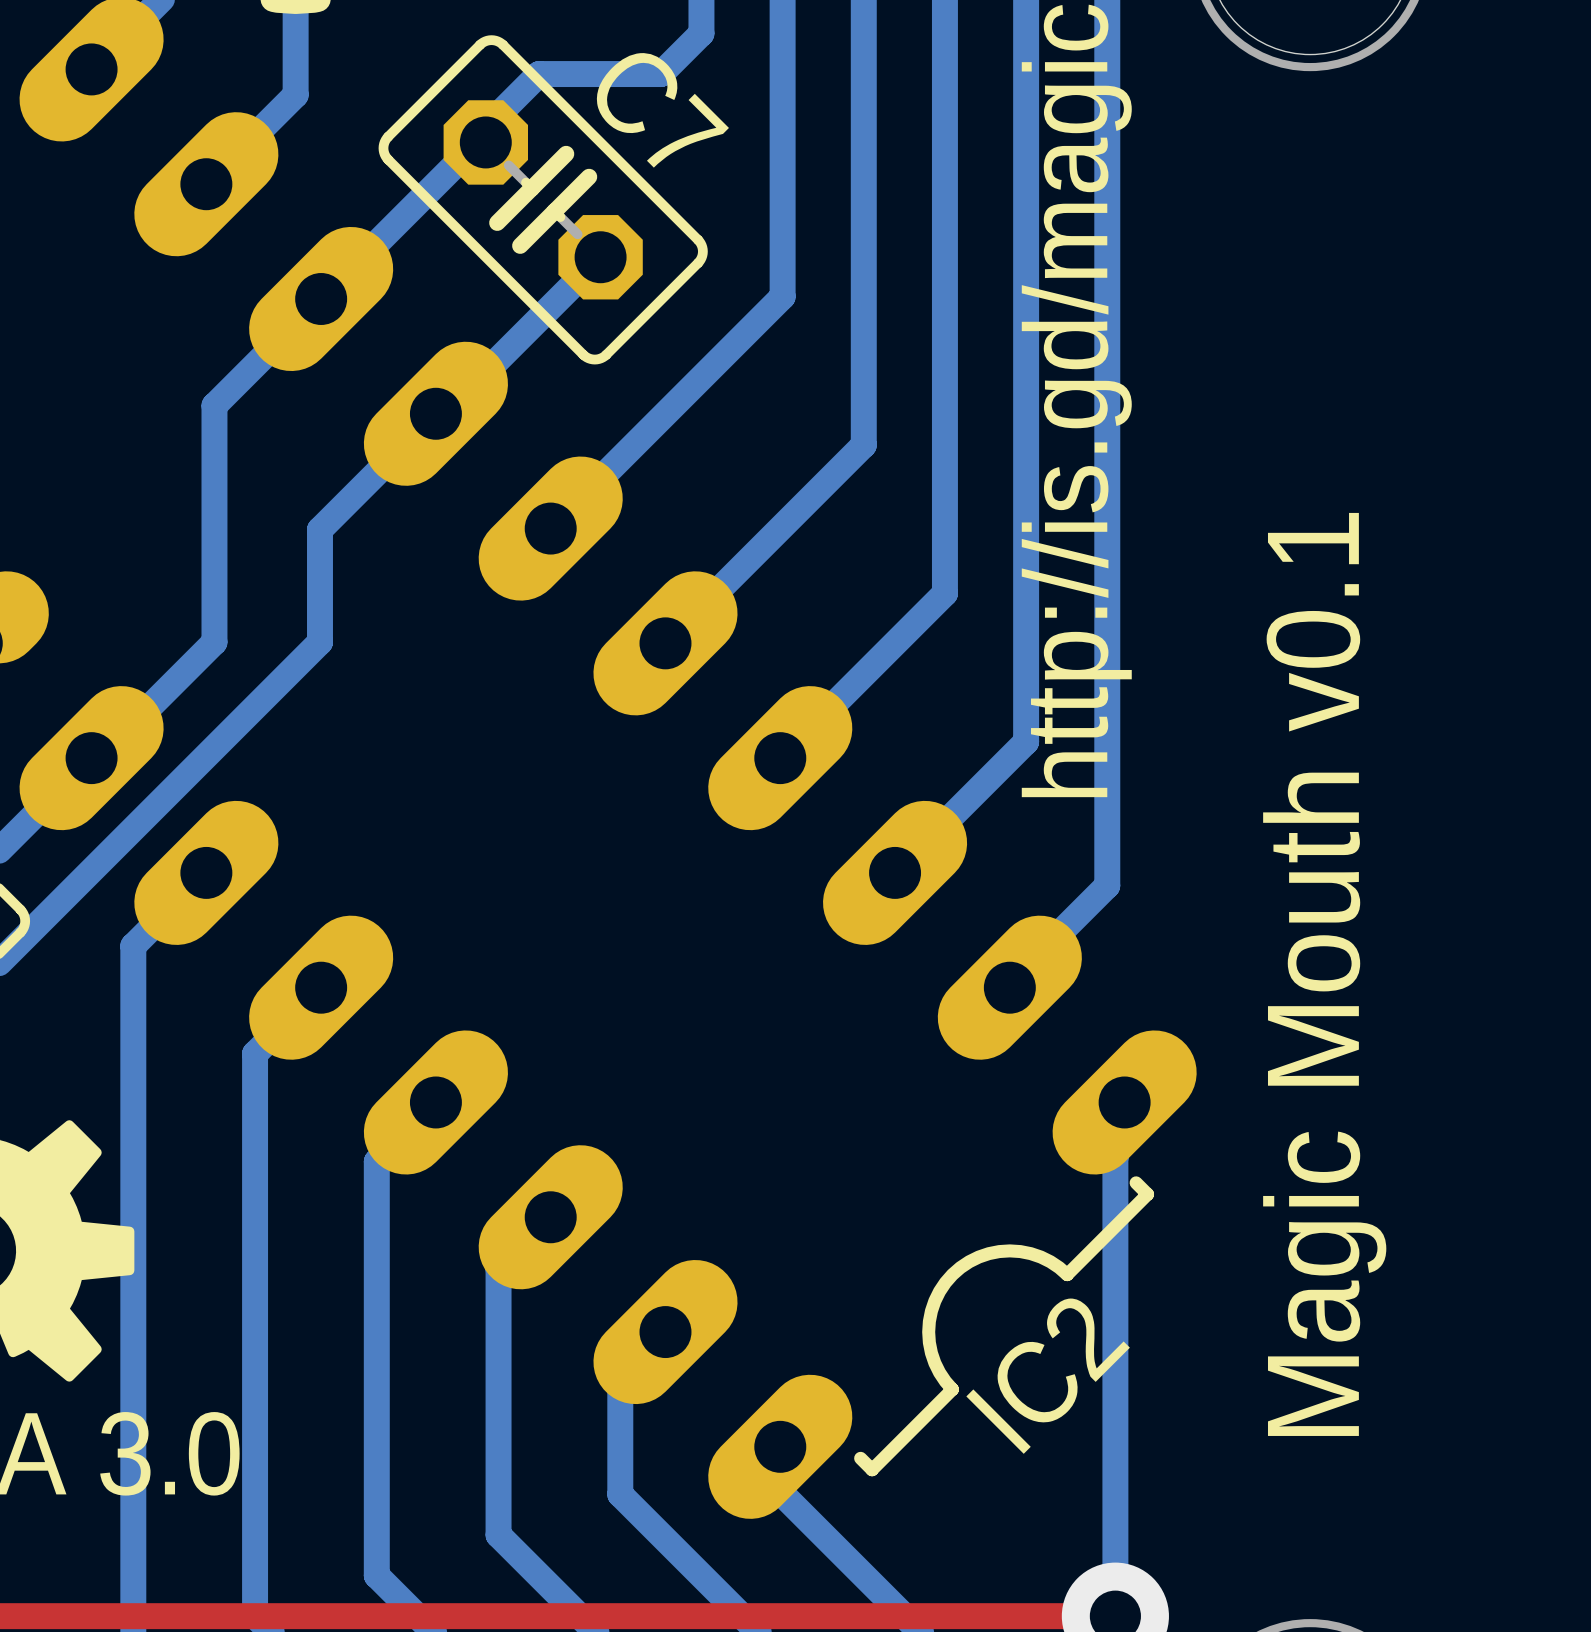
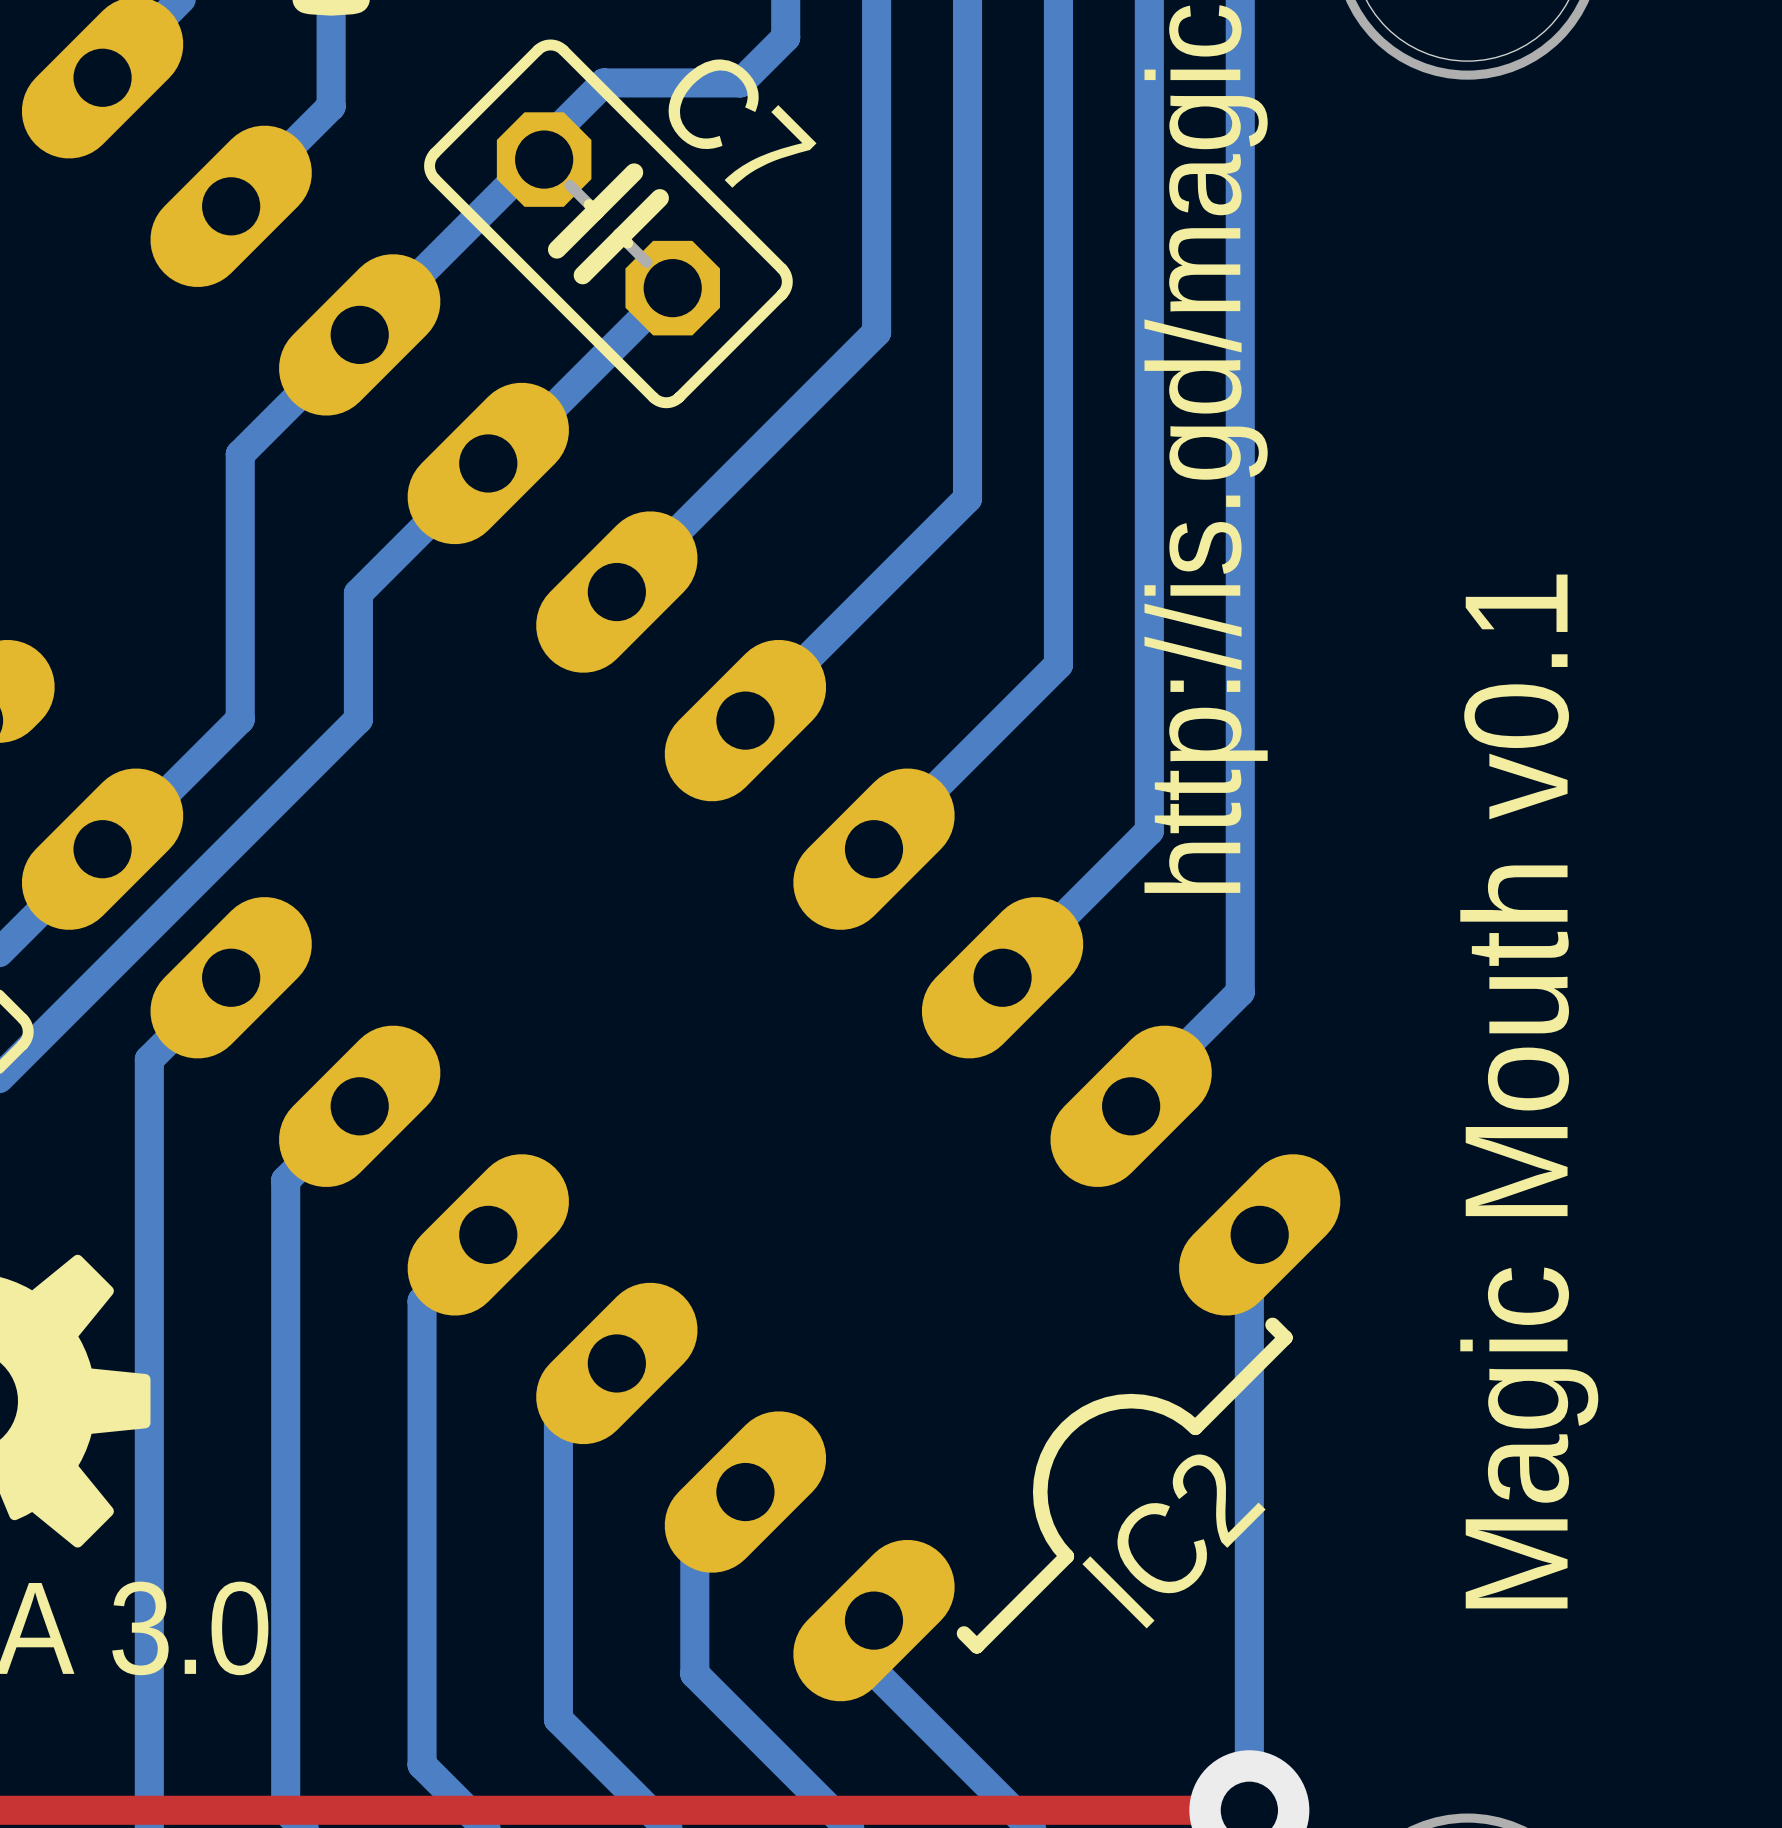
text position: Magic Mouth v0.1 (1324, 974) -> Magic Mouth v0.1 (1529, 1091)

